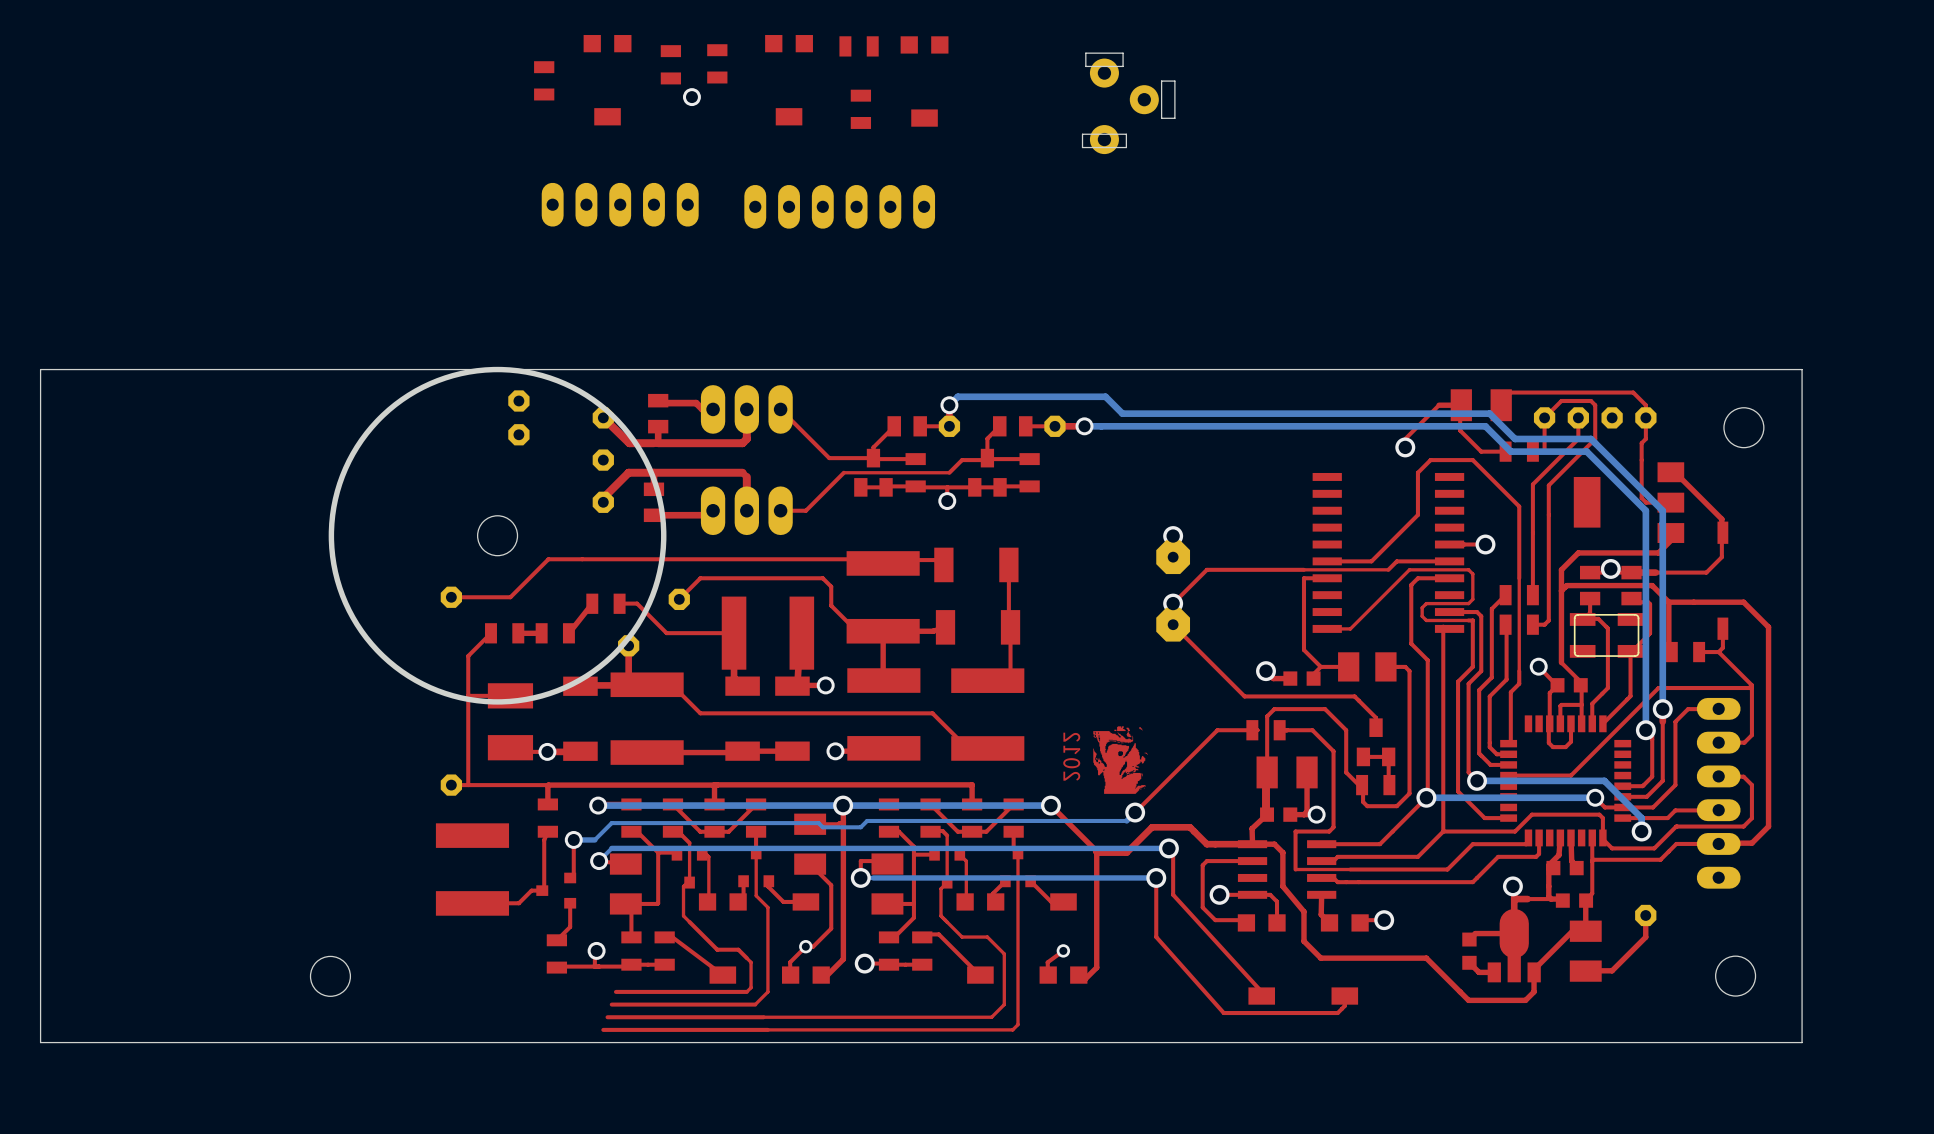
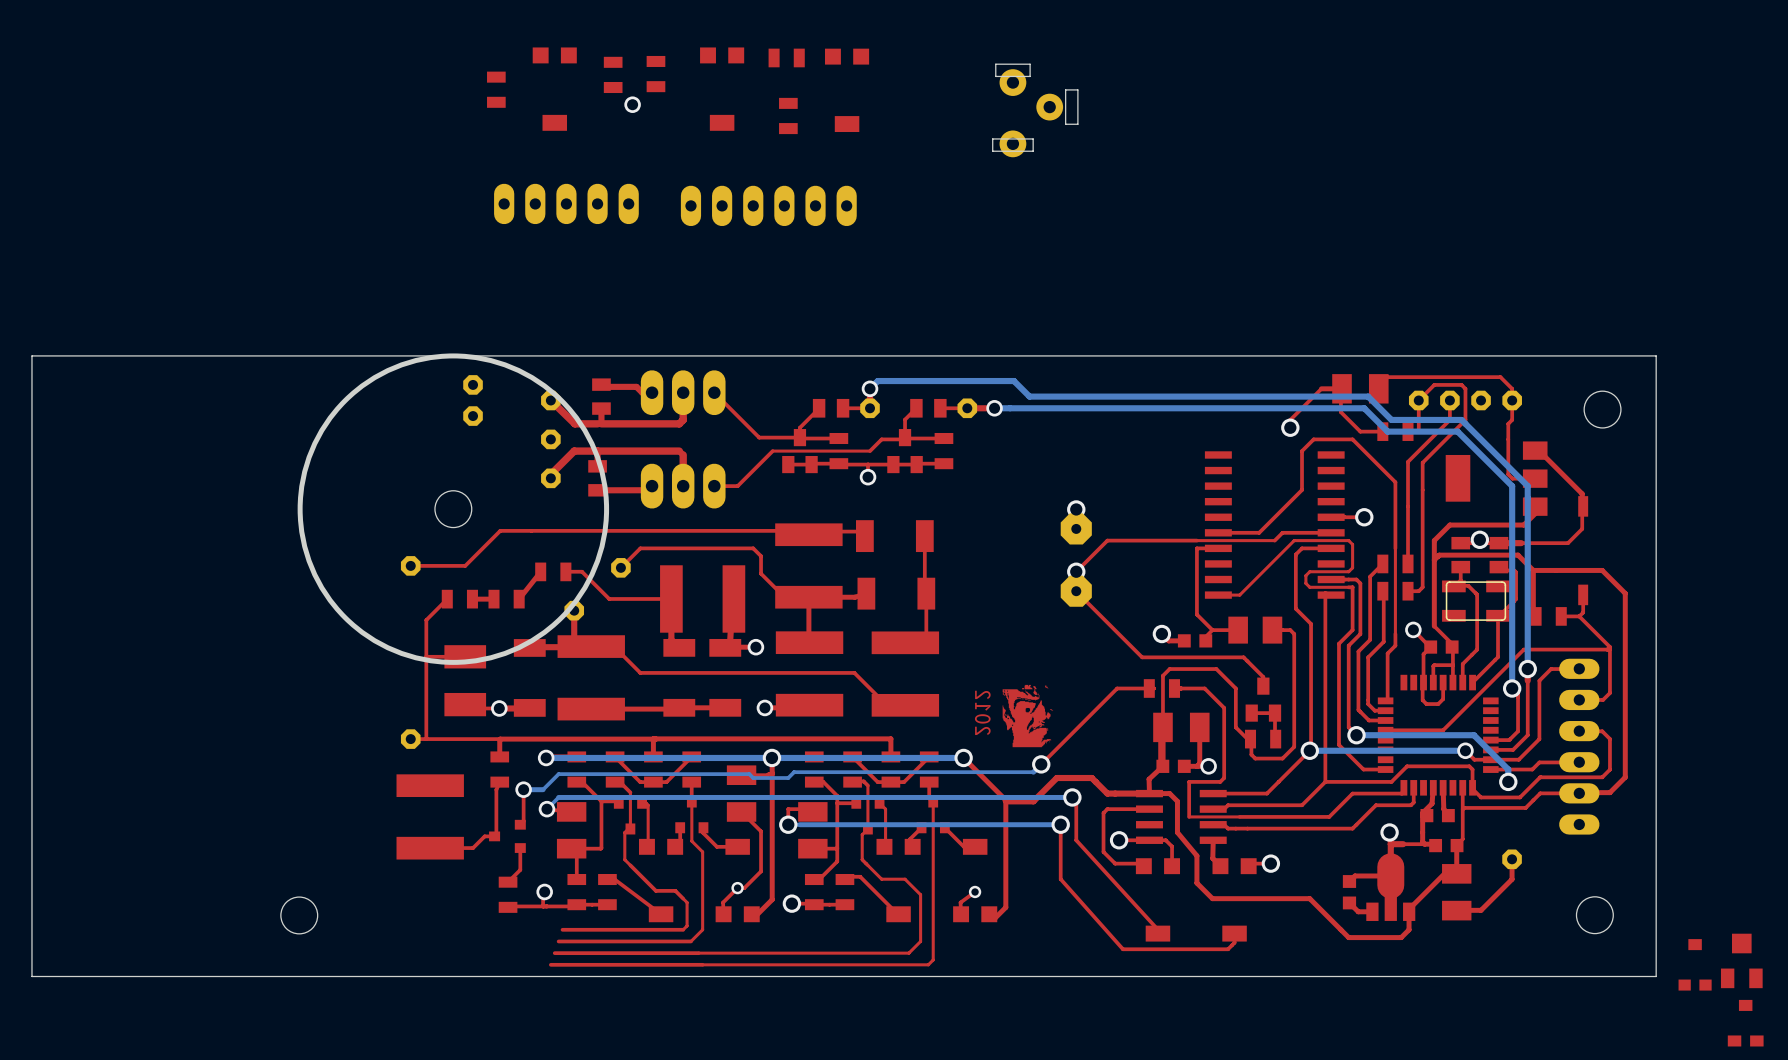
part: none -> (1741, 960)
part: none -> (1695, 964)
part: none -> (1745, 1023)

